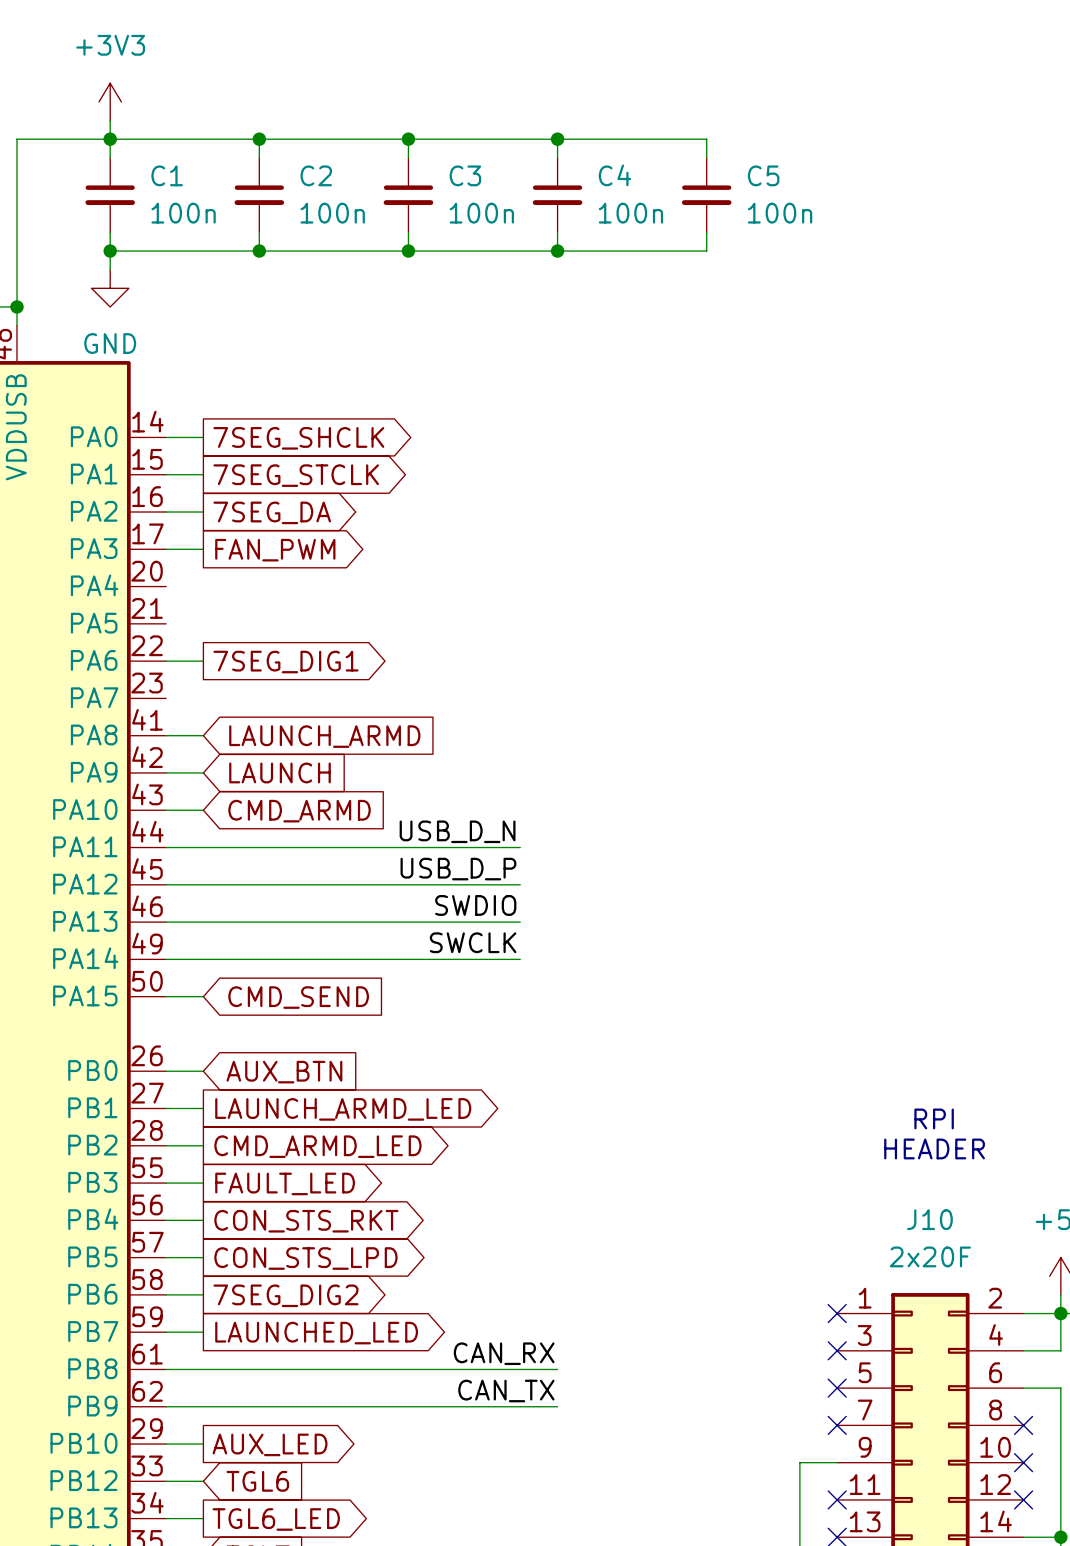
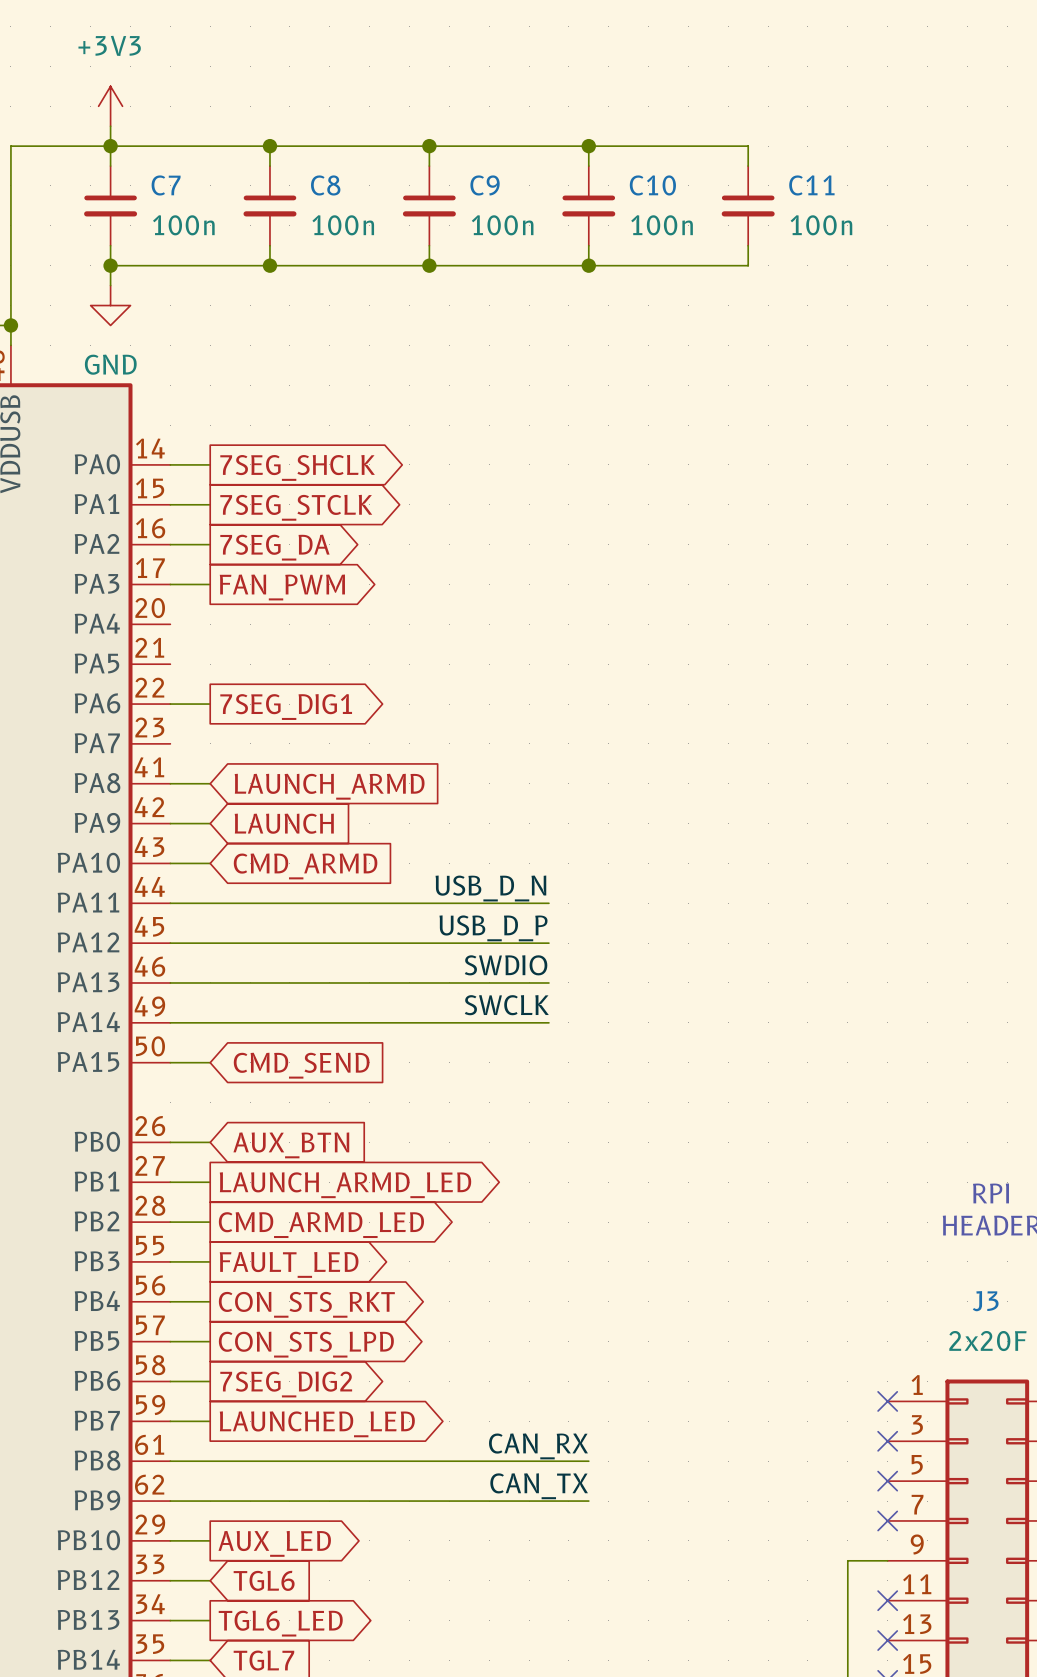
C1 name: C1 (167, 175) -> C7 (166, 185)
C2 name: C2 (316, 175) -> C8 (325, 185)
C3 name: C3 (465, 175) -> C9 (485, 185)
C4 name: C4 (614, 175) -> C10 (652, 185)
C5 name: C5 (763, 175) -> C11 (811, 185)
J10 name: J10 (929, 1219) -> J3 (985, 1301)

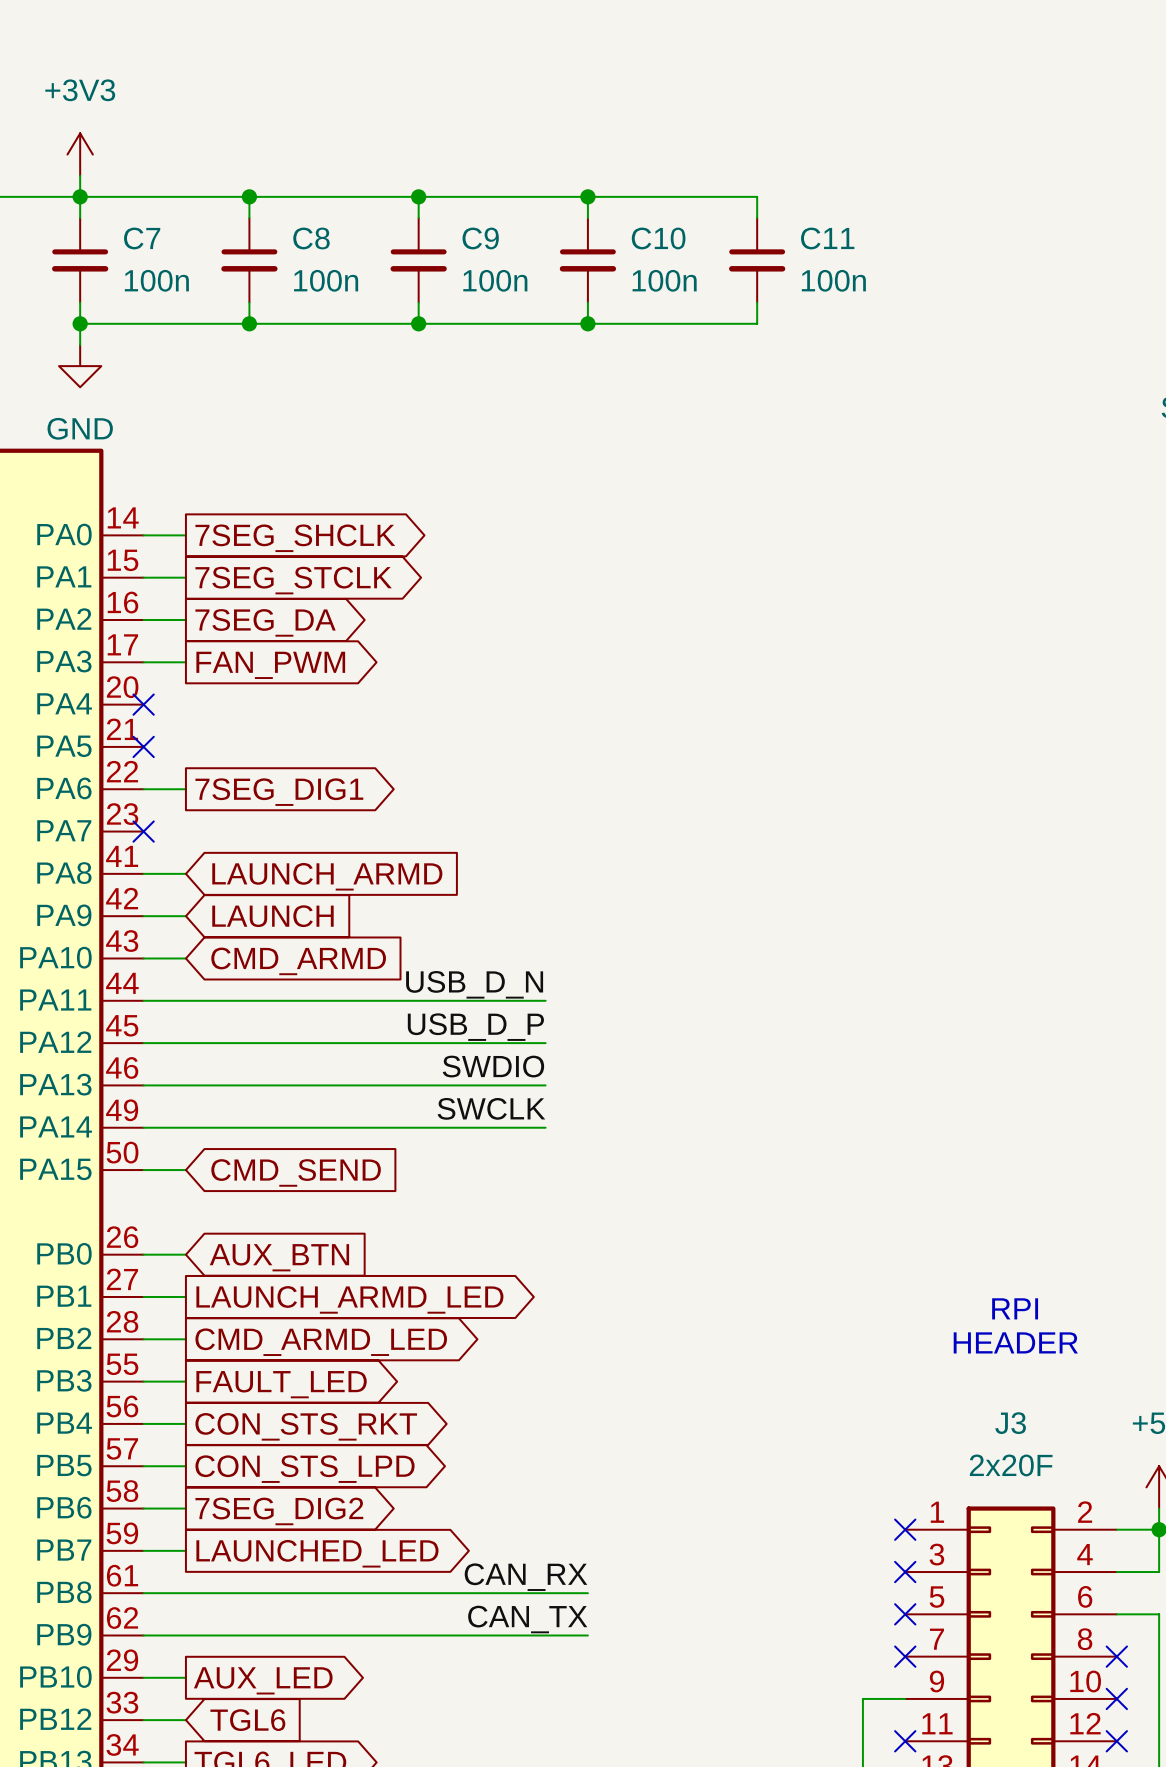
no-connect mark: none -> (143, 704)
no-connect mark: none -> (143, 746)
no-connect mark: none -> (143, 831)

